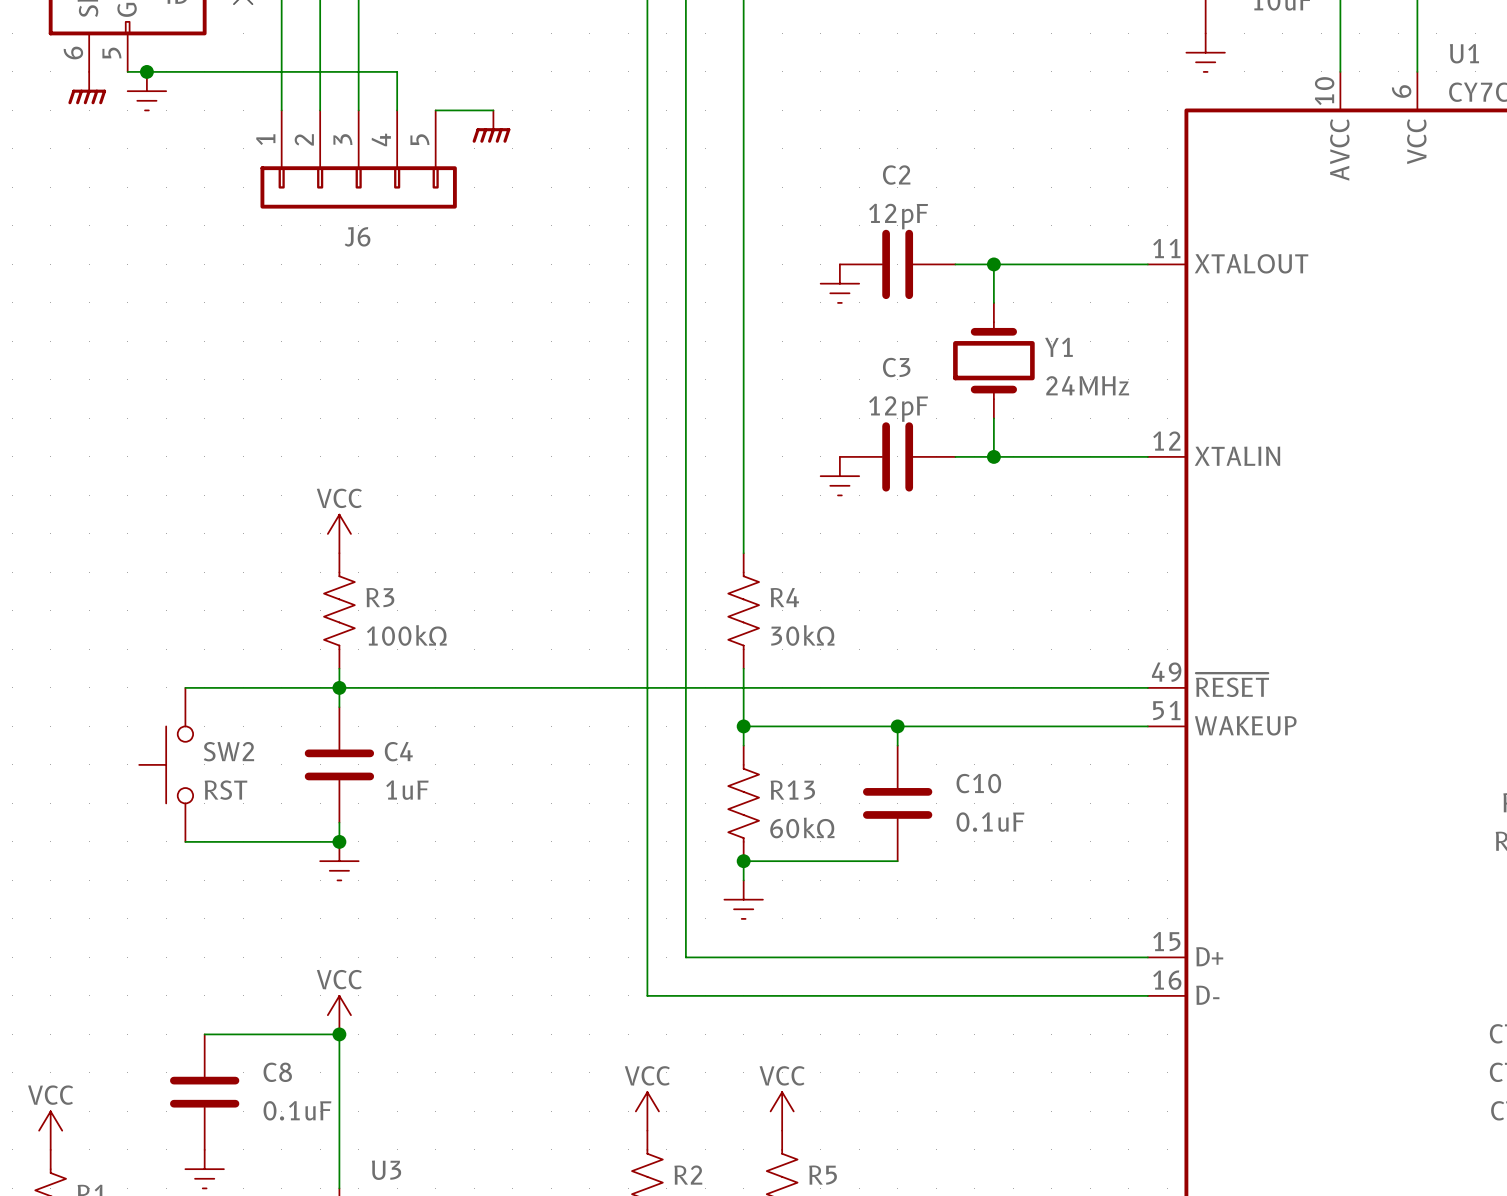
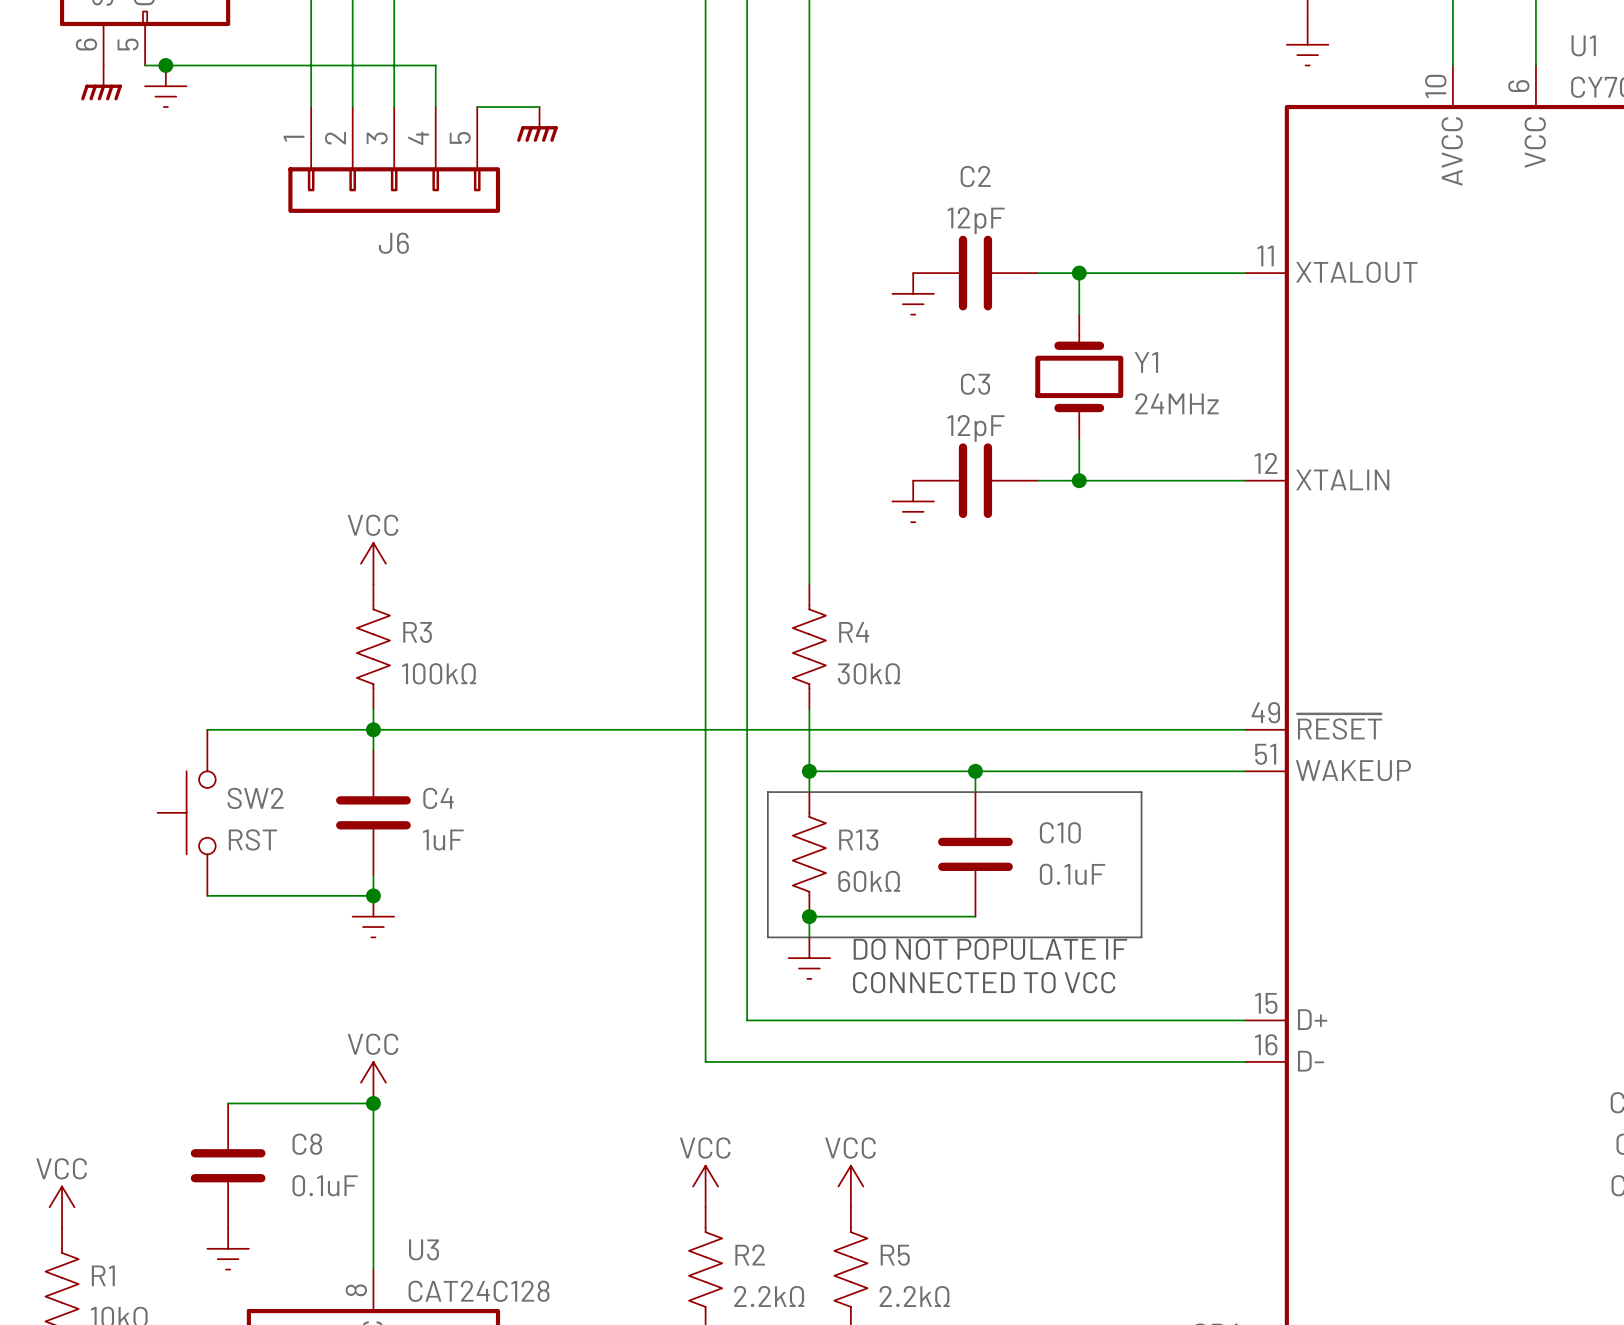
line: none -> (767, 792) (1141, 792) (1141, 937) (767, 937) (767, 792)
text: none -> DO NOT POPULATE IF (990, 949)
text: none -> CONNECTED TO VCC (984, 982)

